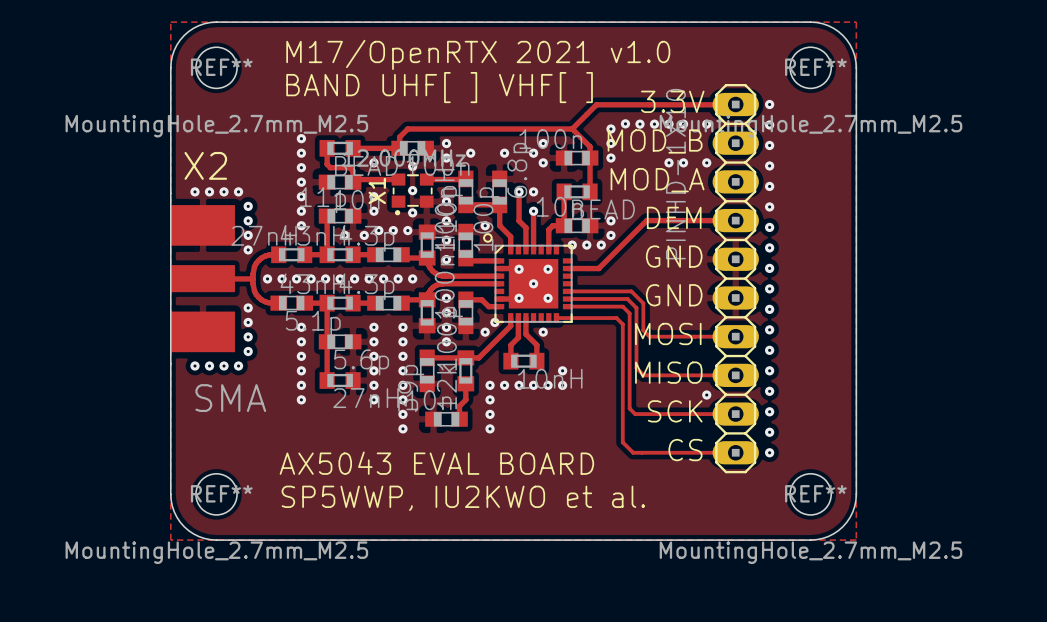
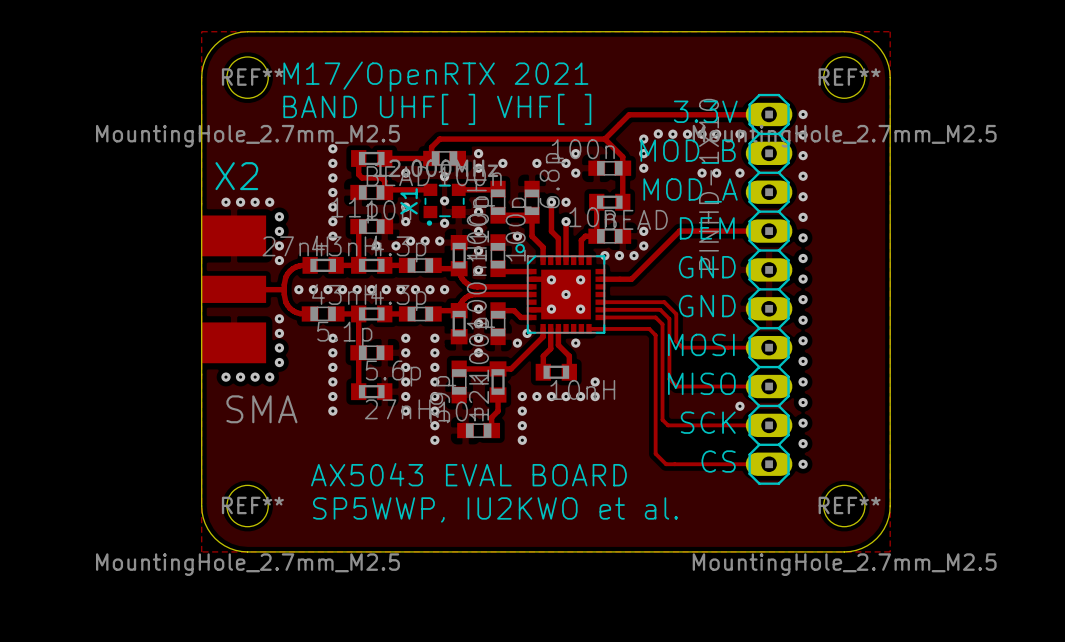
text: M17/OpenRTX 2021 v1.0 (478, 54) -> M17/OpenRTX 2021 (435, 76)
text position: BAND UHF[ ] VHF[ ] (439, 87) -> BAND UHF[ ] VHF[ ] (437, 109)

